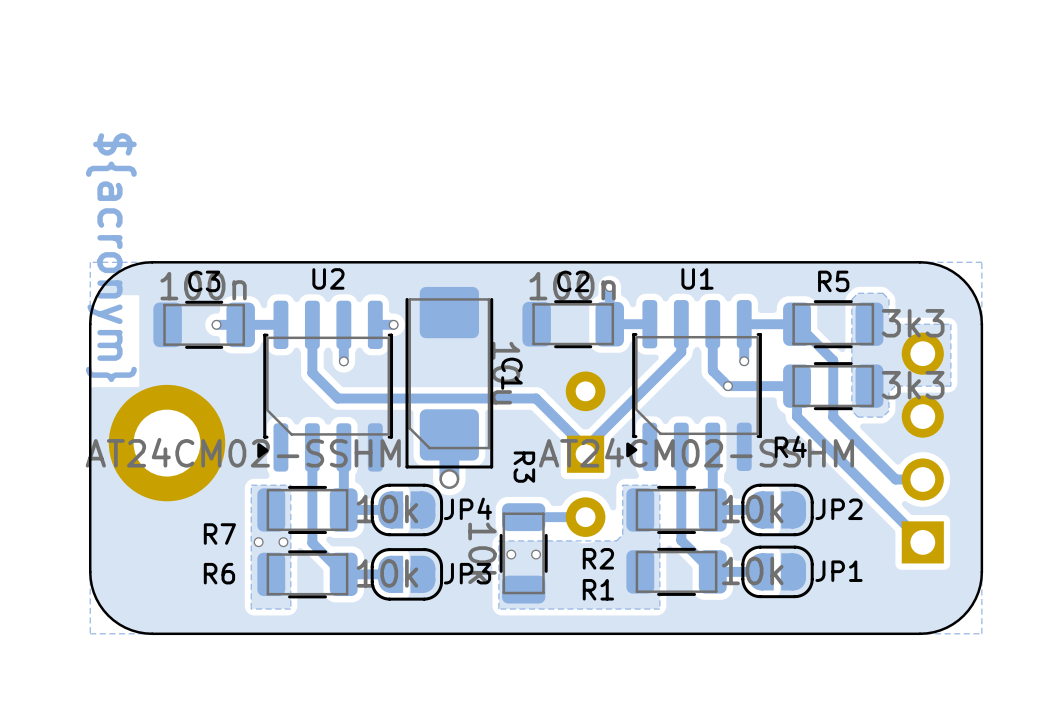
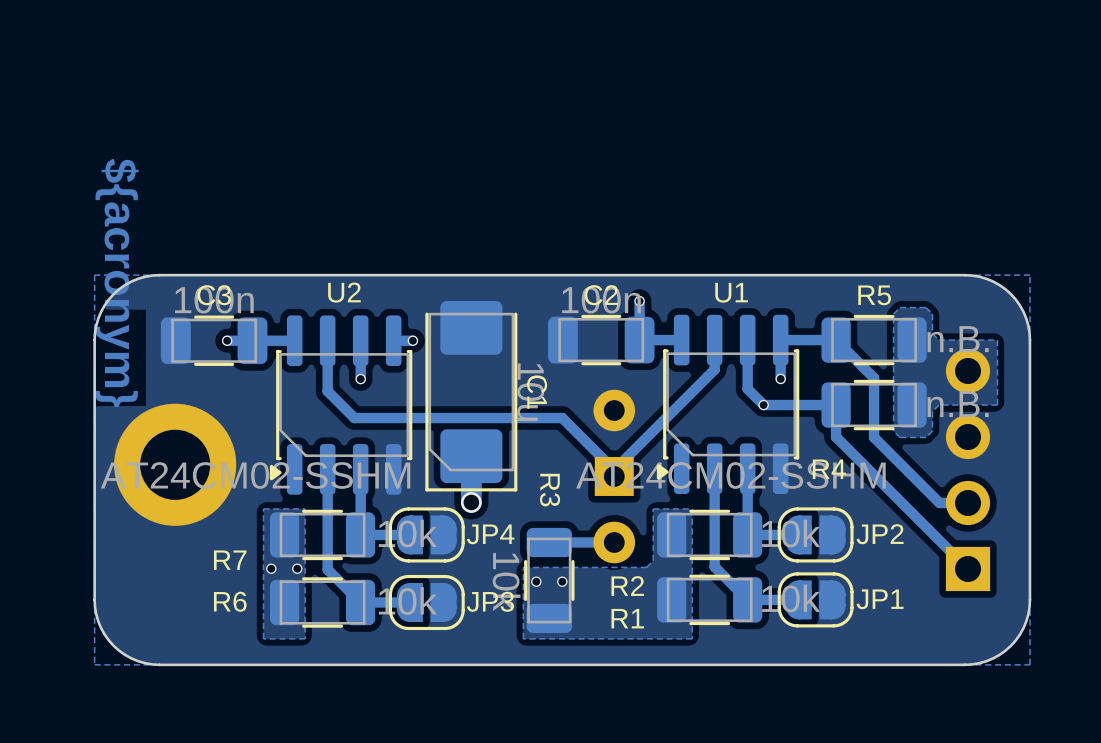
R5 value: 3k3 (913, 323) -> n.B. (958, 339)
R4 value: 3k3 (913, 385) -> n.B. (958, 404)

